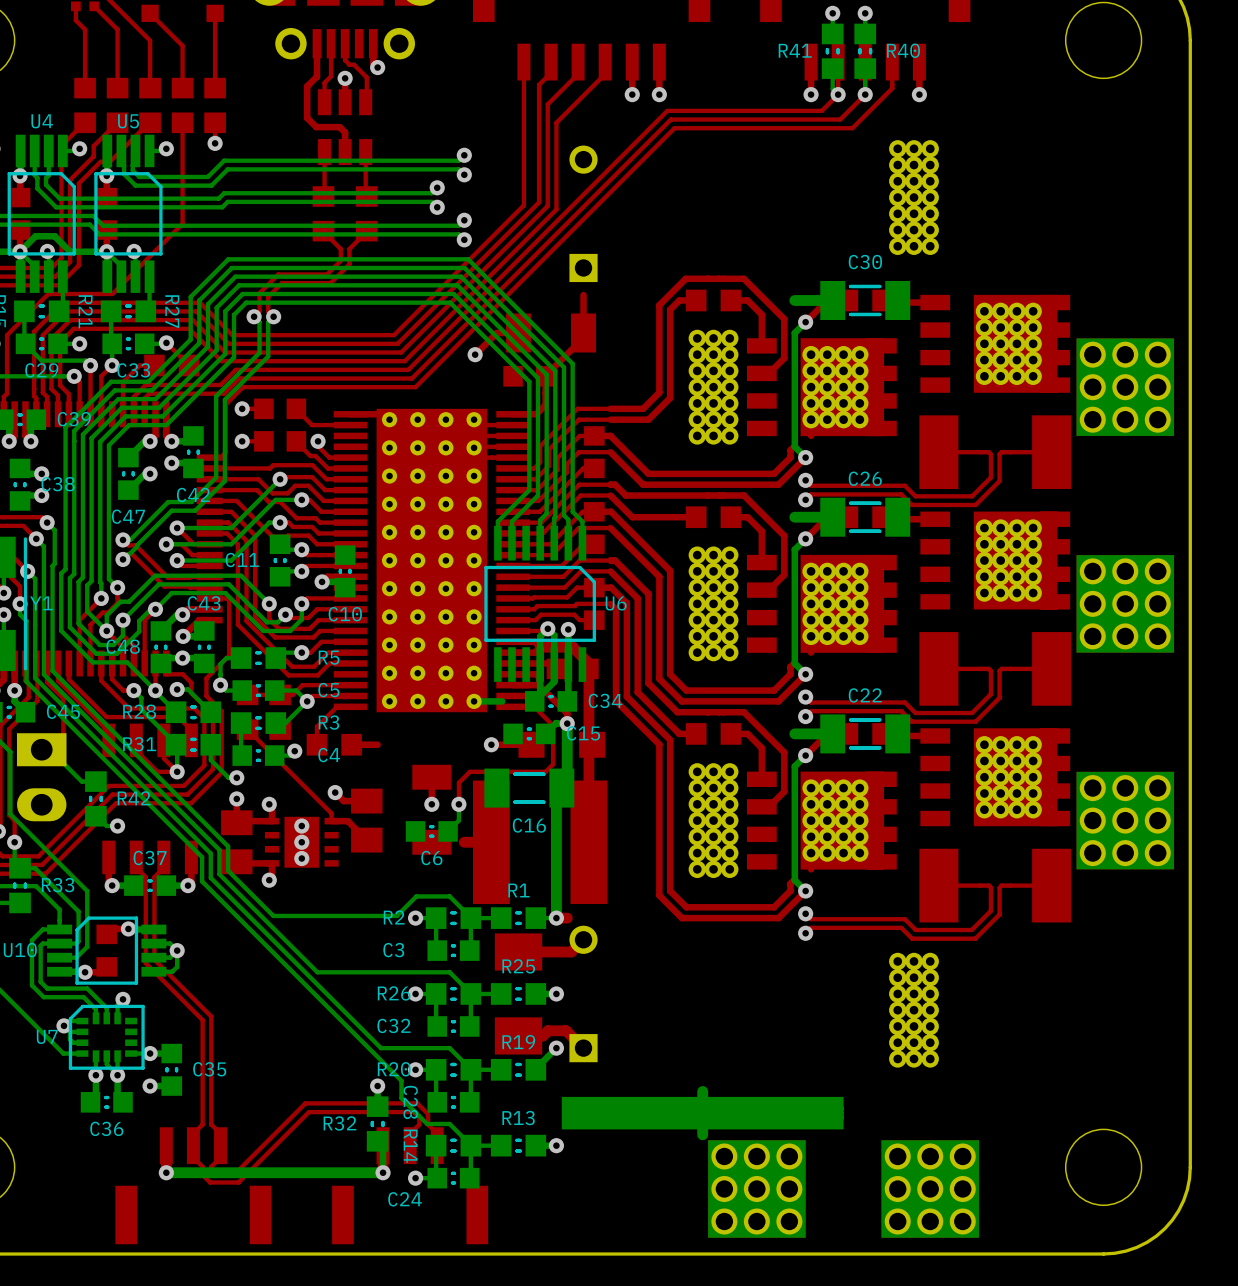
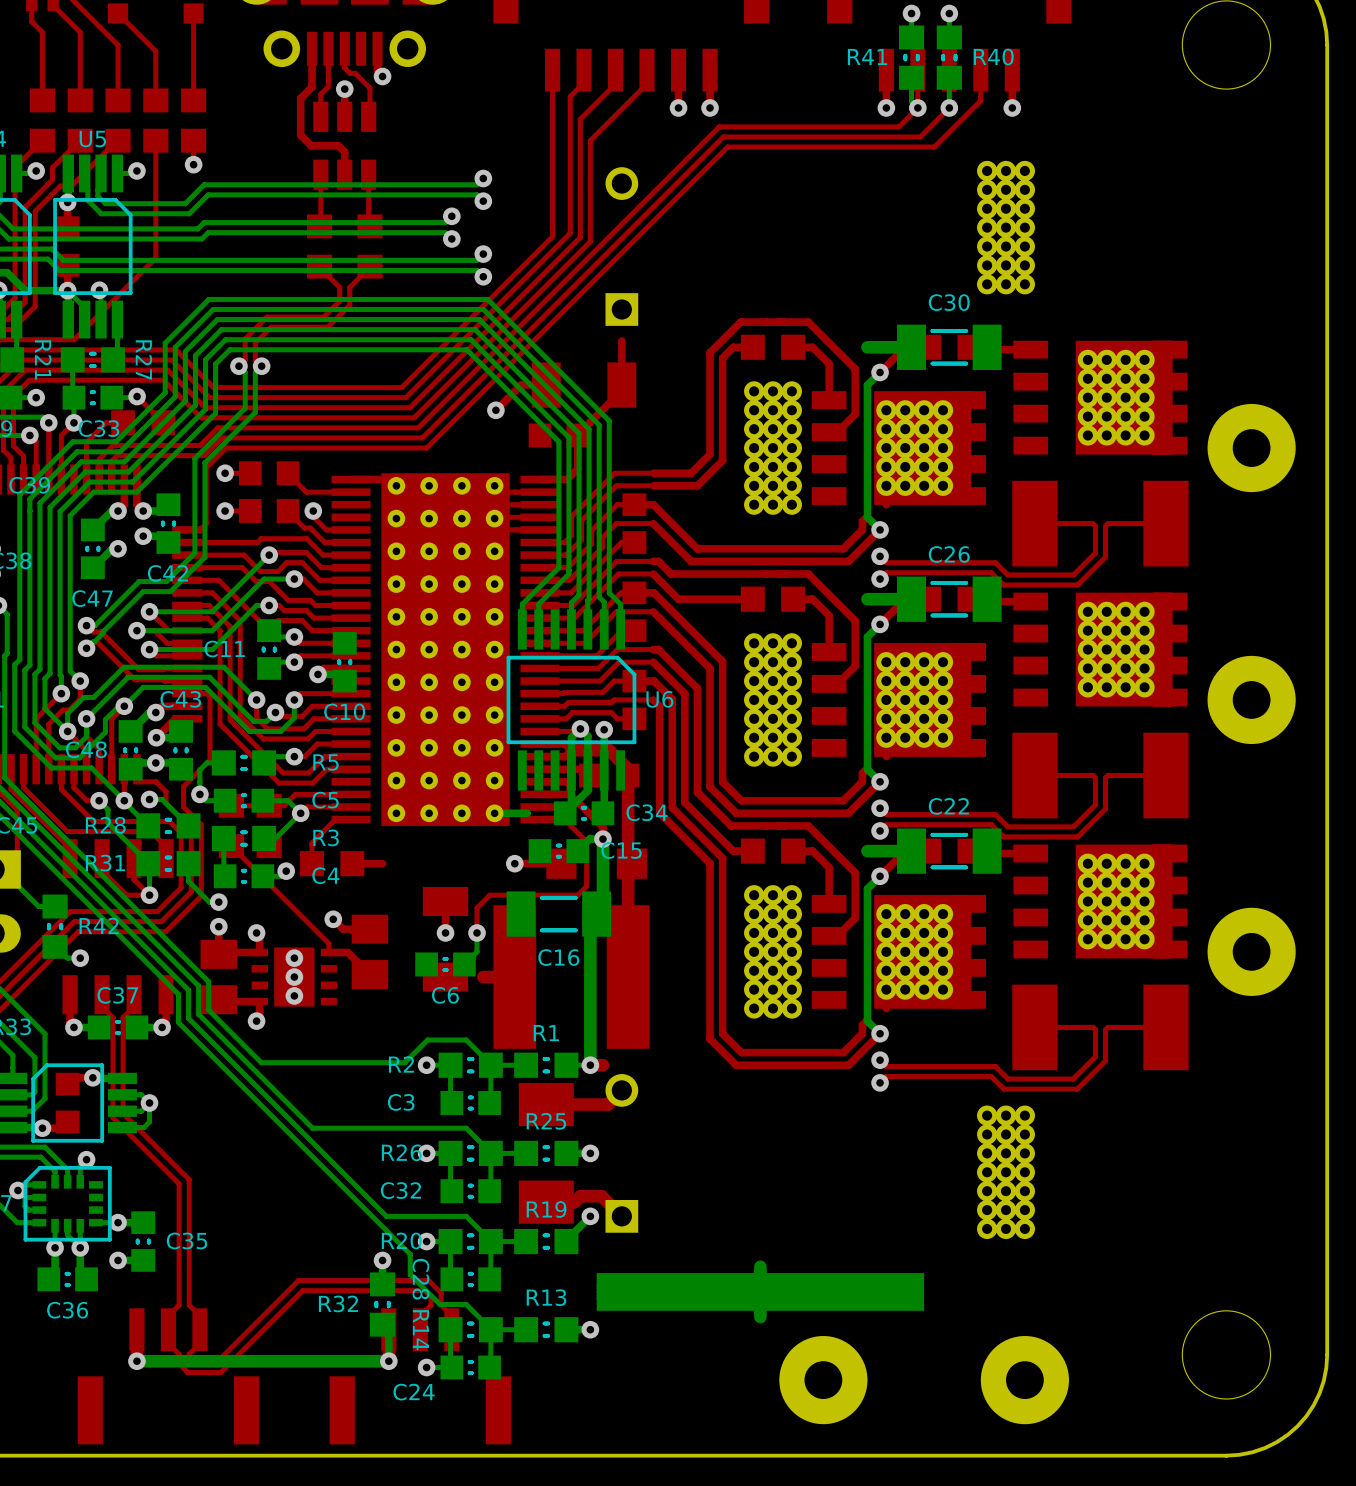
part footprint: [1076, 338, 1175, 436] -> [1207, 403, 1296, 493]
part footprint: [1076, 555, 1175, 653] -> [1207, 655, 1296, 745]
part footprint: [1076, 771, 1175, 870] -> [1207, 907, 1296, 996]
part footprint: [708, 1140, 806, 1238] -> [779, 1336, 868, 1425]
part footprint: [881, 1140, 980, 1238] -> [980, 1336, 1069, 1425]

